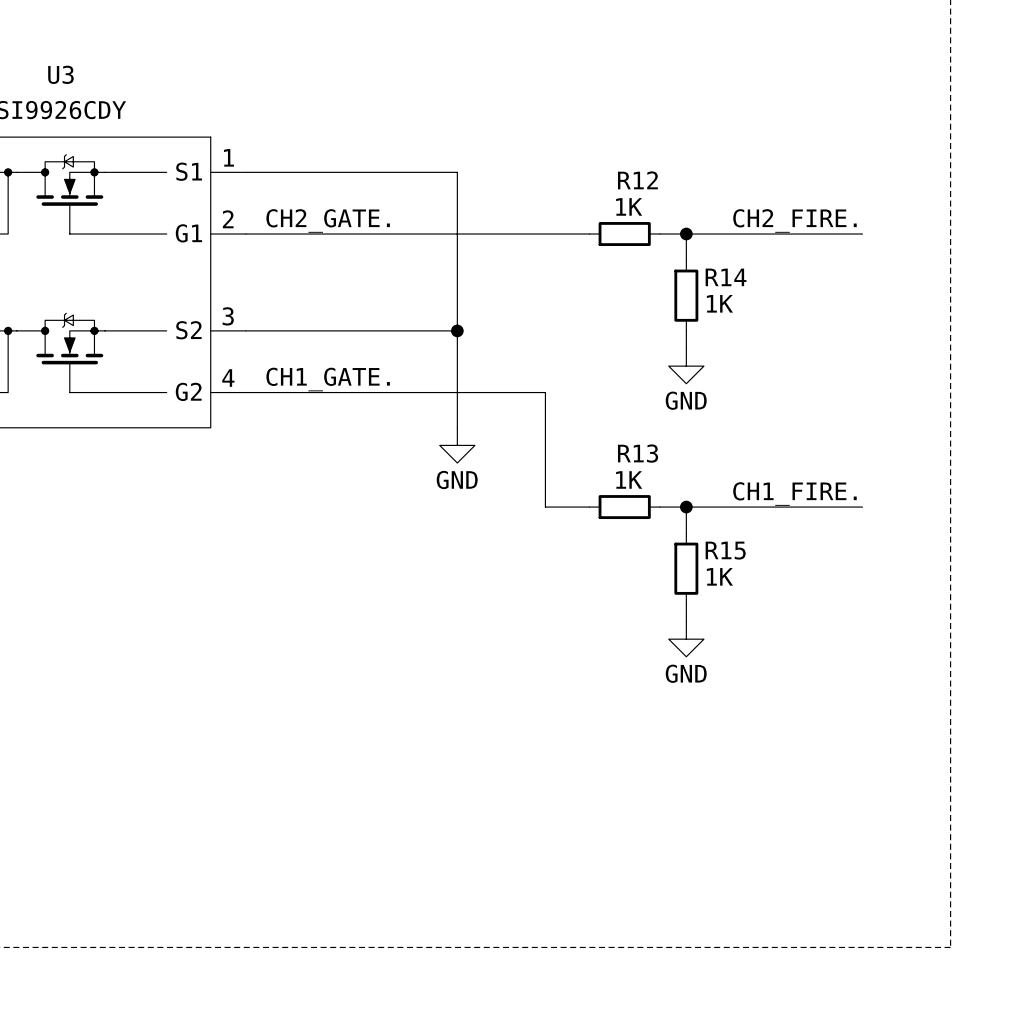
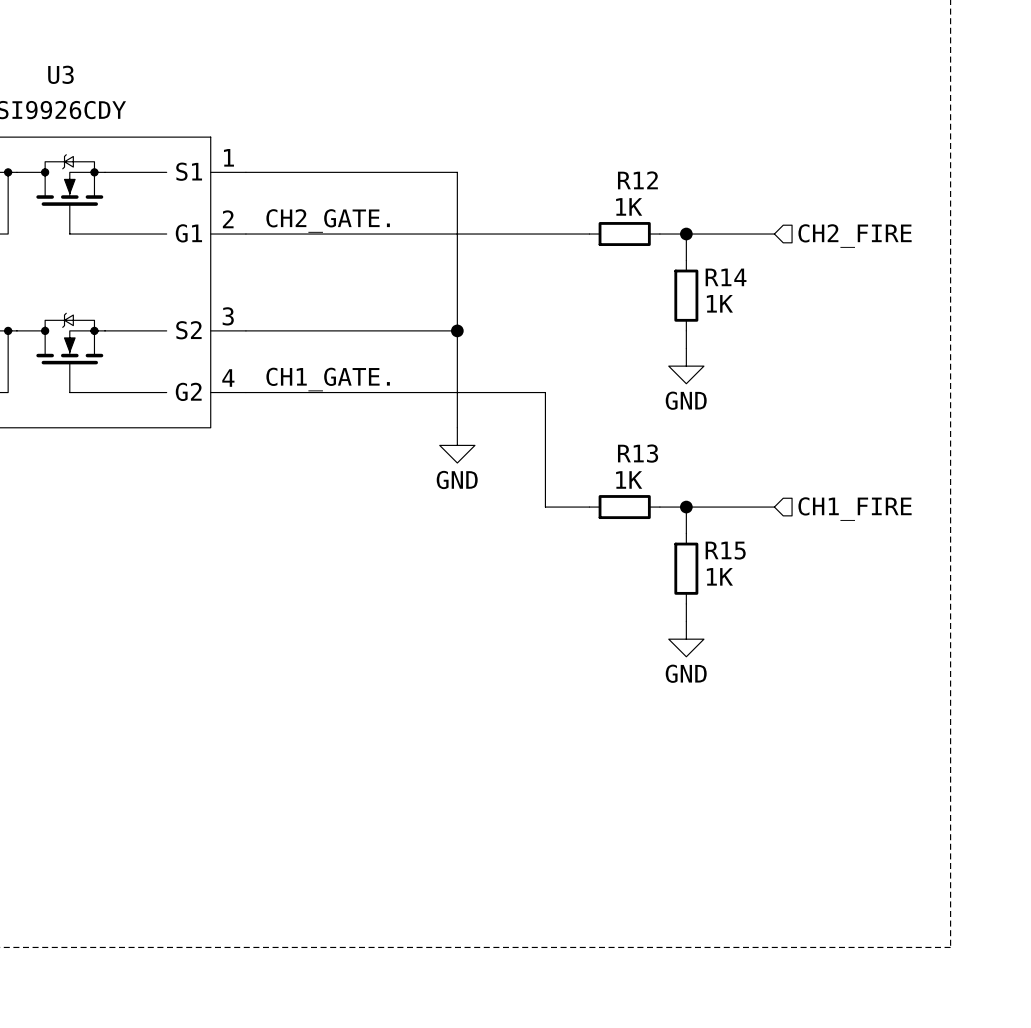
label: CH2_FIRE. (794, 220) -> none
wire: (774, 234) (862, 234) -> none
hierarchical label: none -> CH2_FIRE (855, 236)
label: CH1_FIRE. (794, 494) -> none
wire: (774, 507) (862, 507) -> none
hierarchical label: none -> CH1_FIRE (855, 509)

